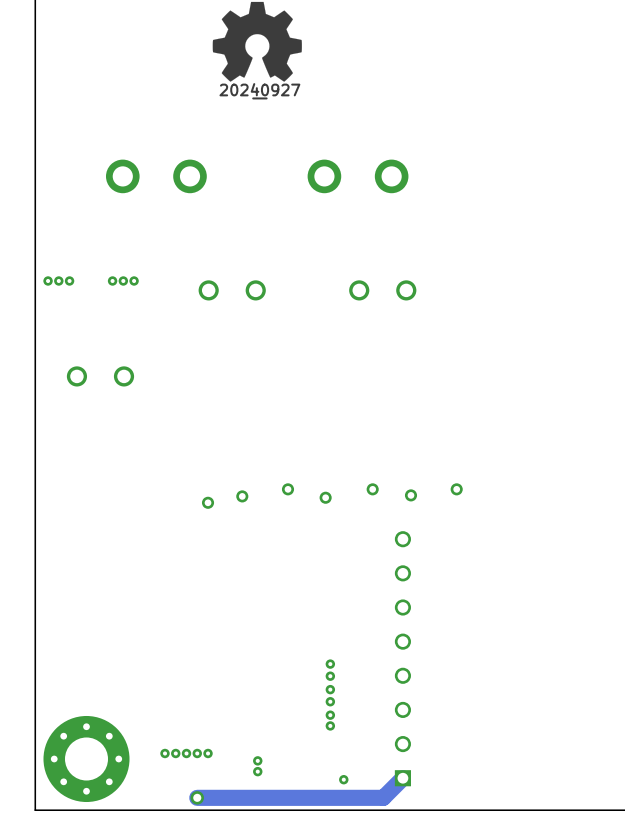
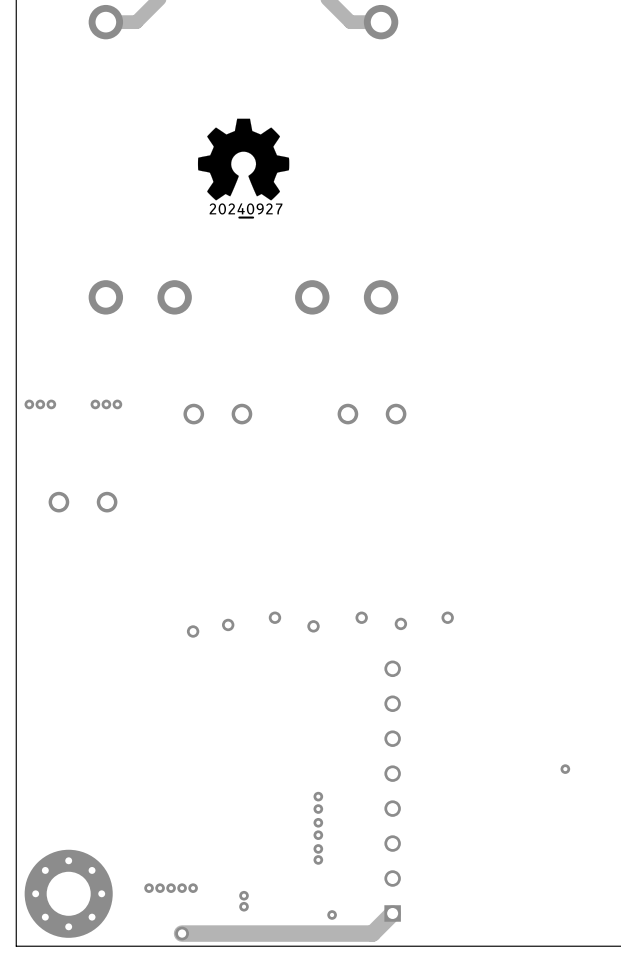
via: none -> (565, 769)

